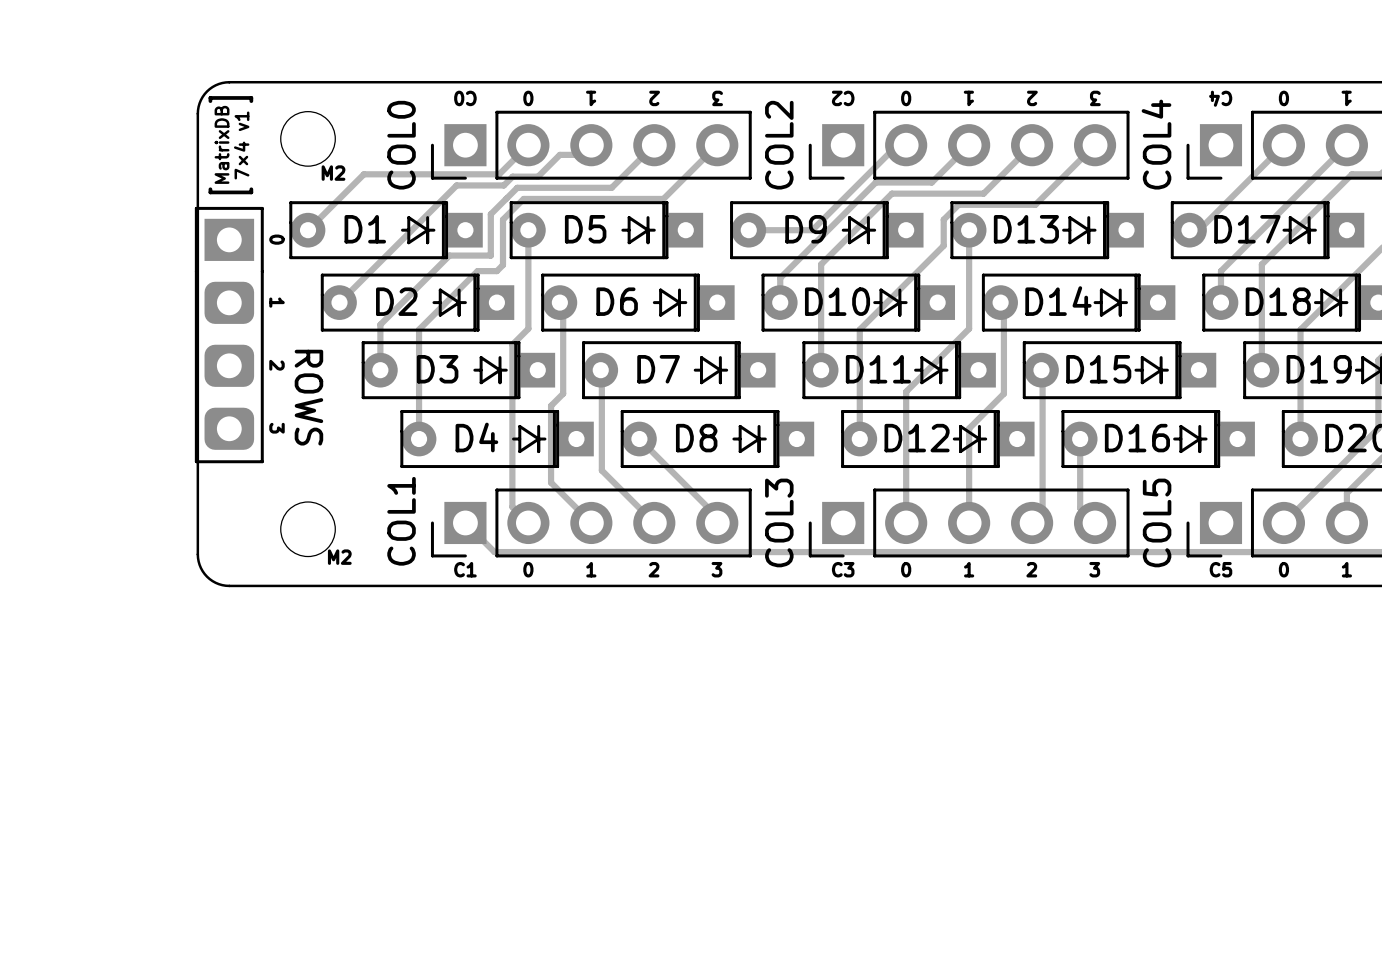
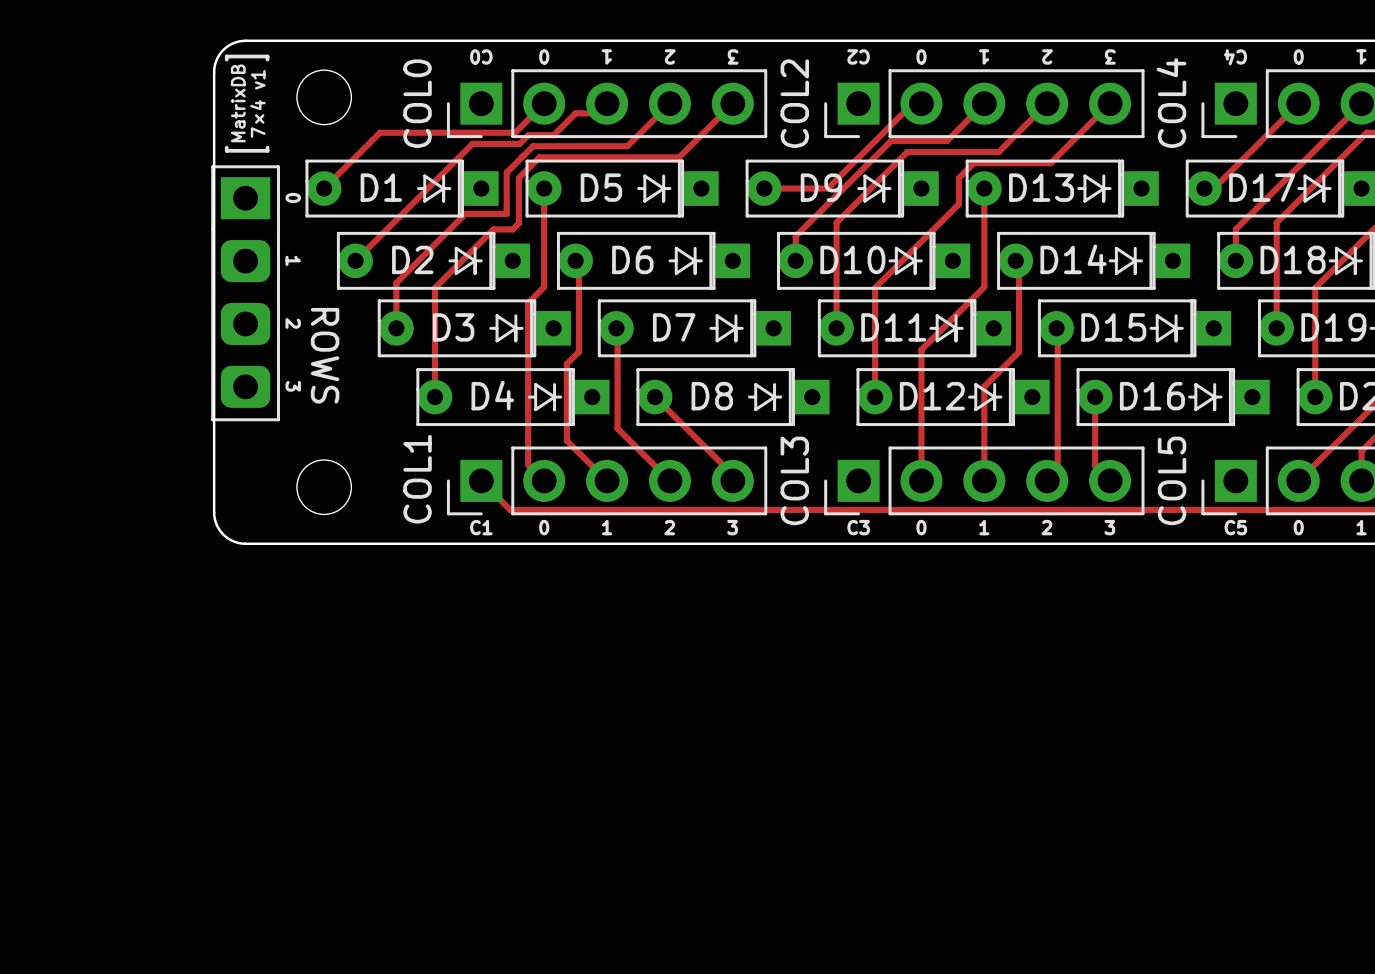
text: M2 (333, 173) -> none
text: M2 (339, 557) -> none

